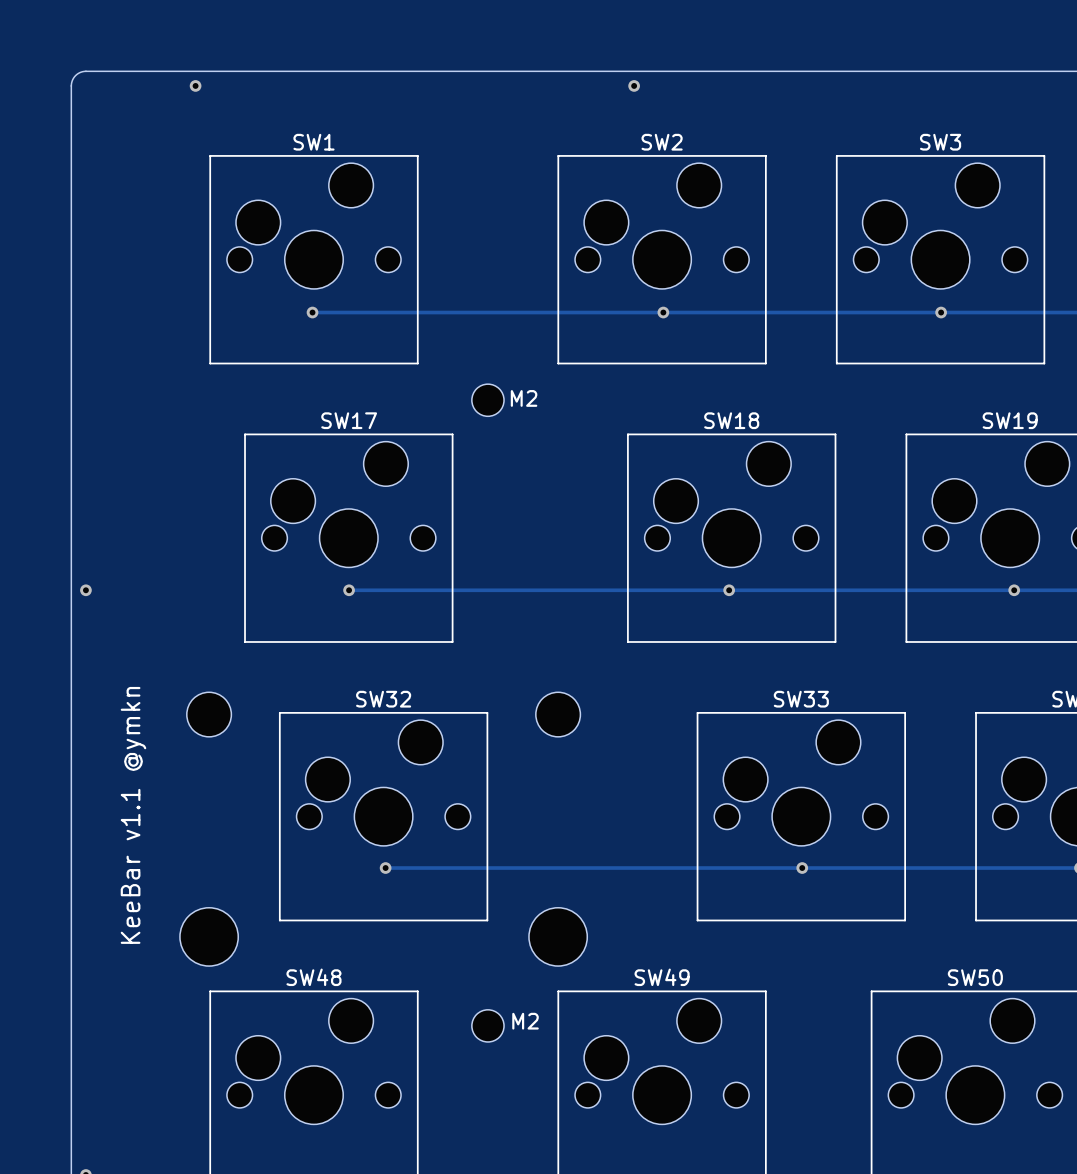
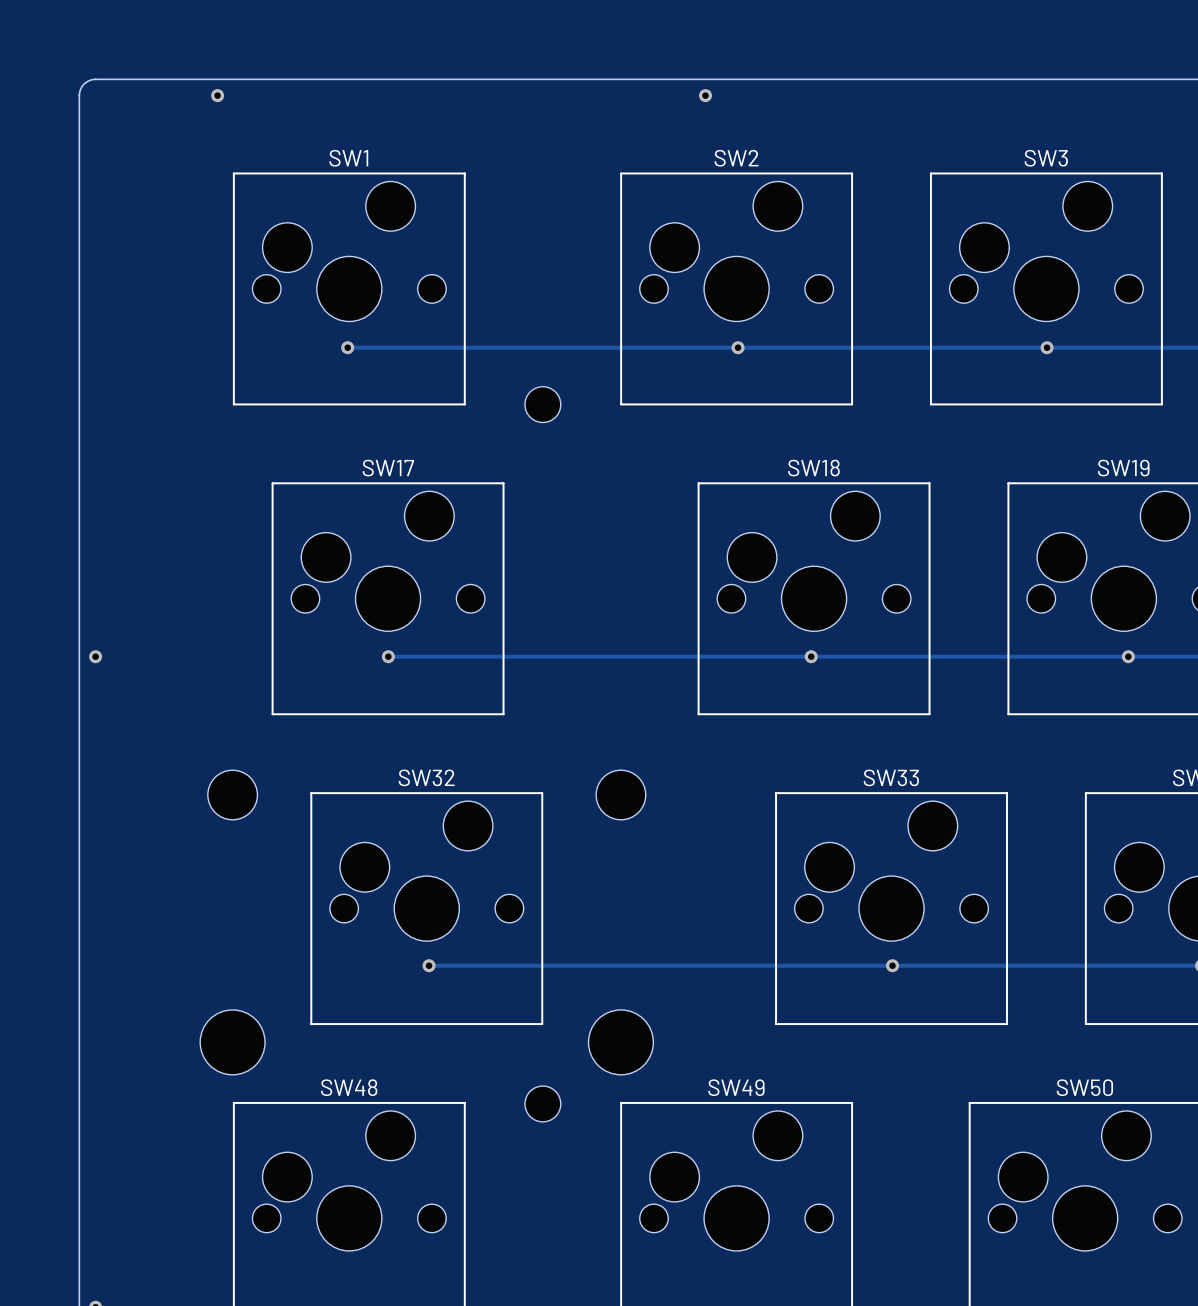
text: M2 (524, 398) -> none
part position: (487, 400) -> (542, 404)
text: KeeBar v1.1 @ymkn (133, 815) -> none
text: M2 (525, 1021) -> none
part position: (487, 1025) -> (542, 1103)

